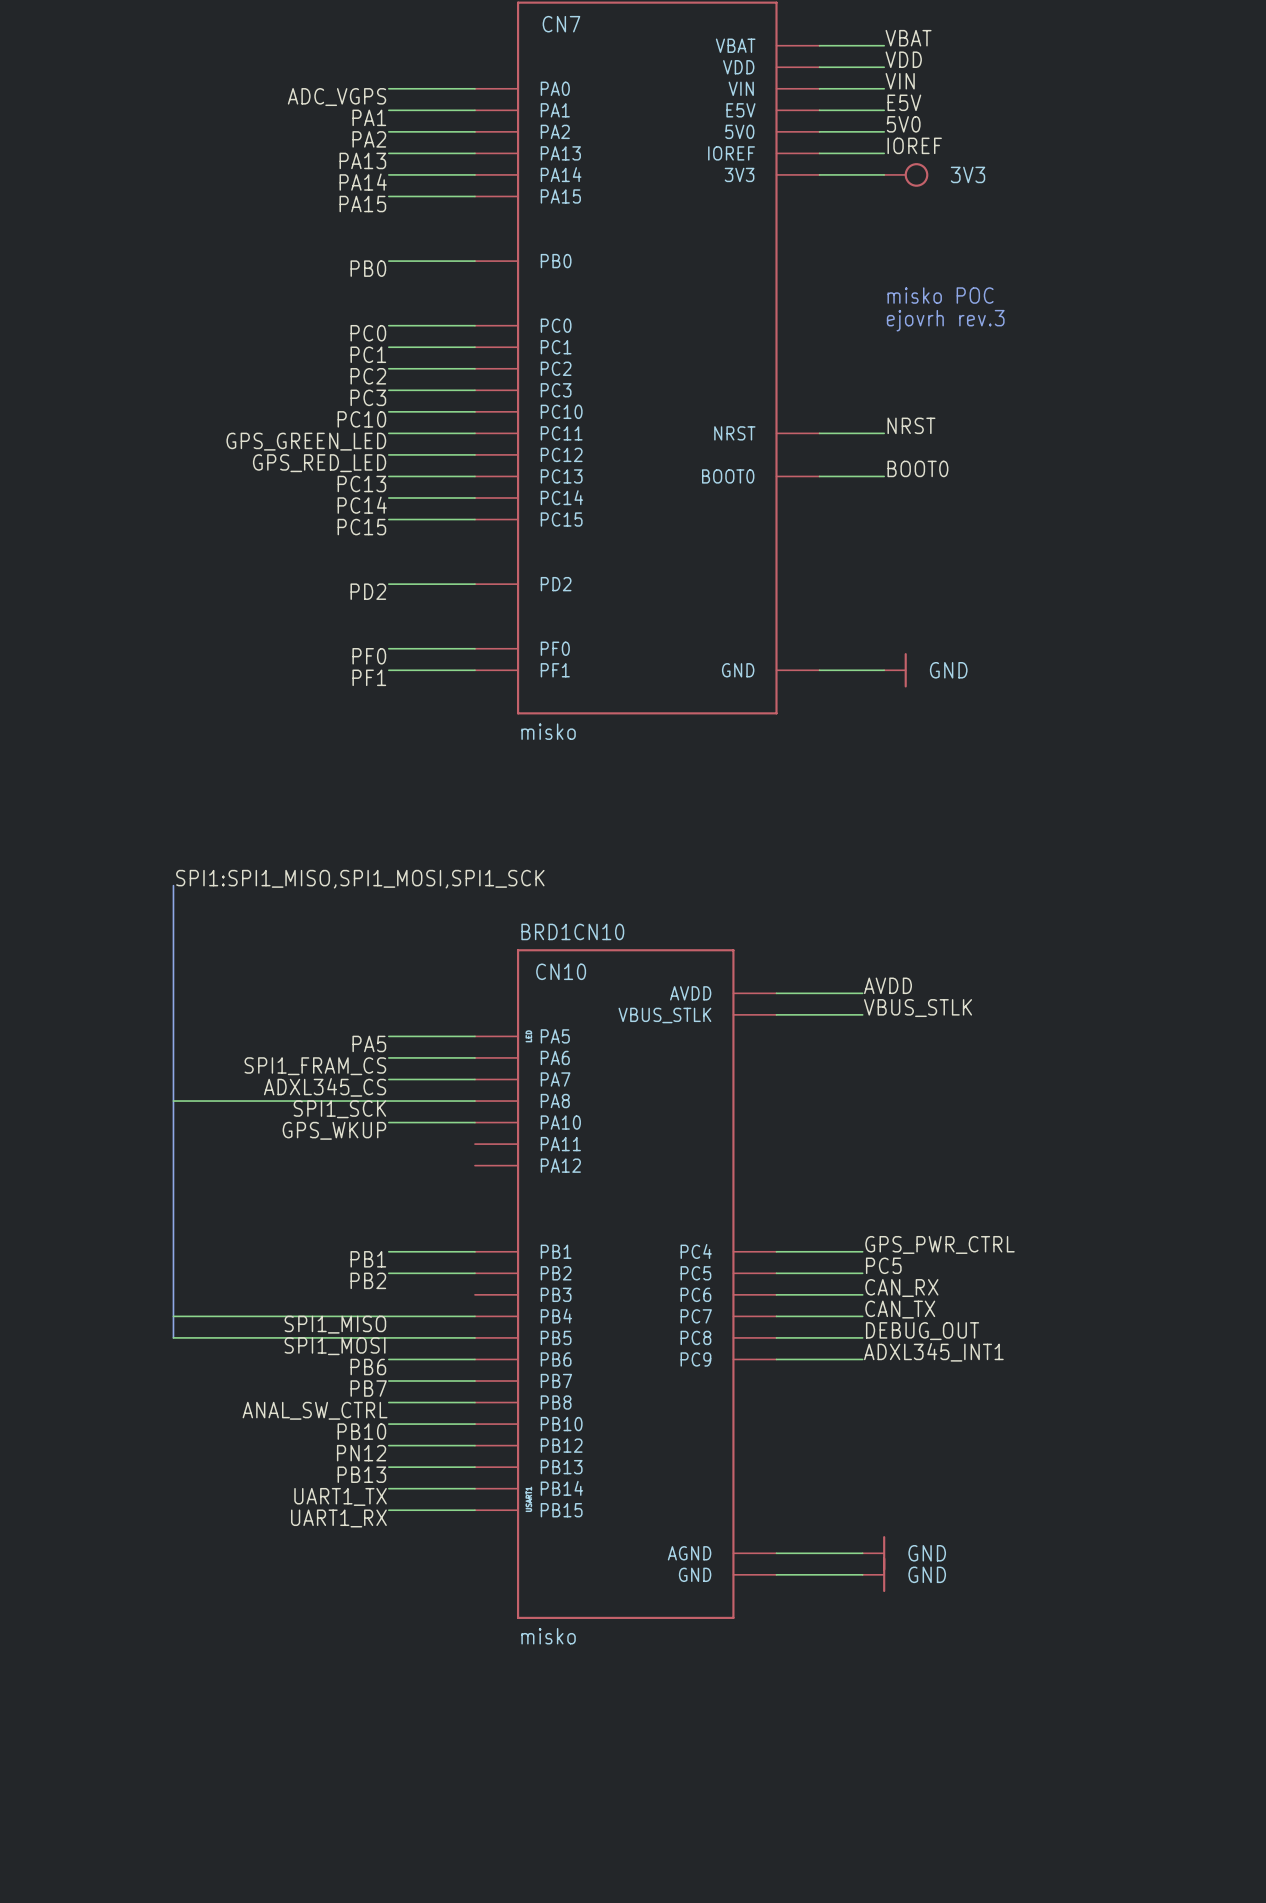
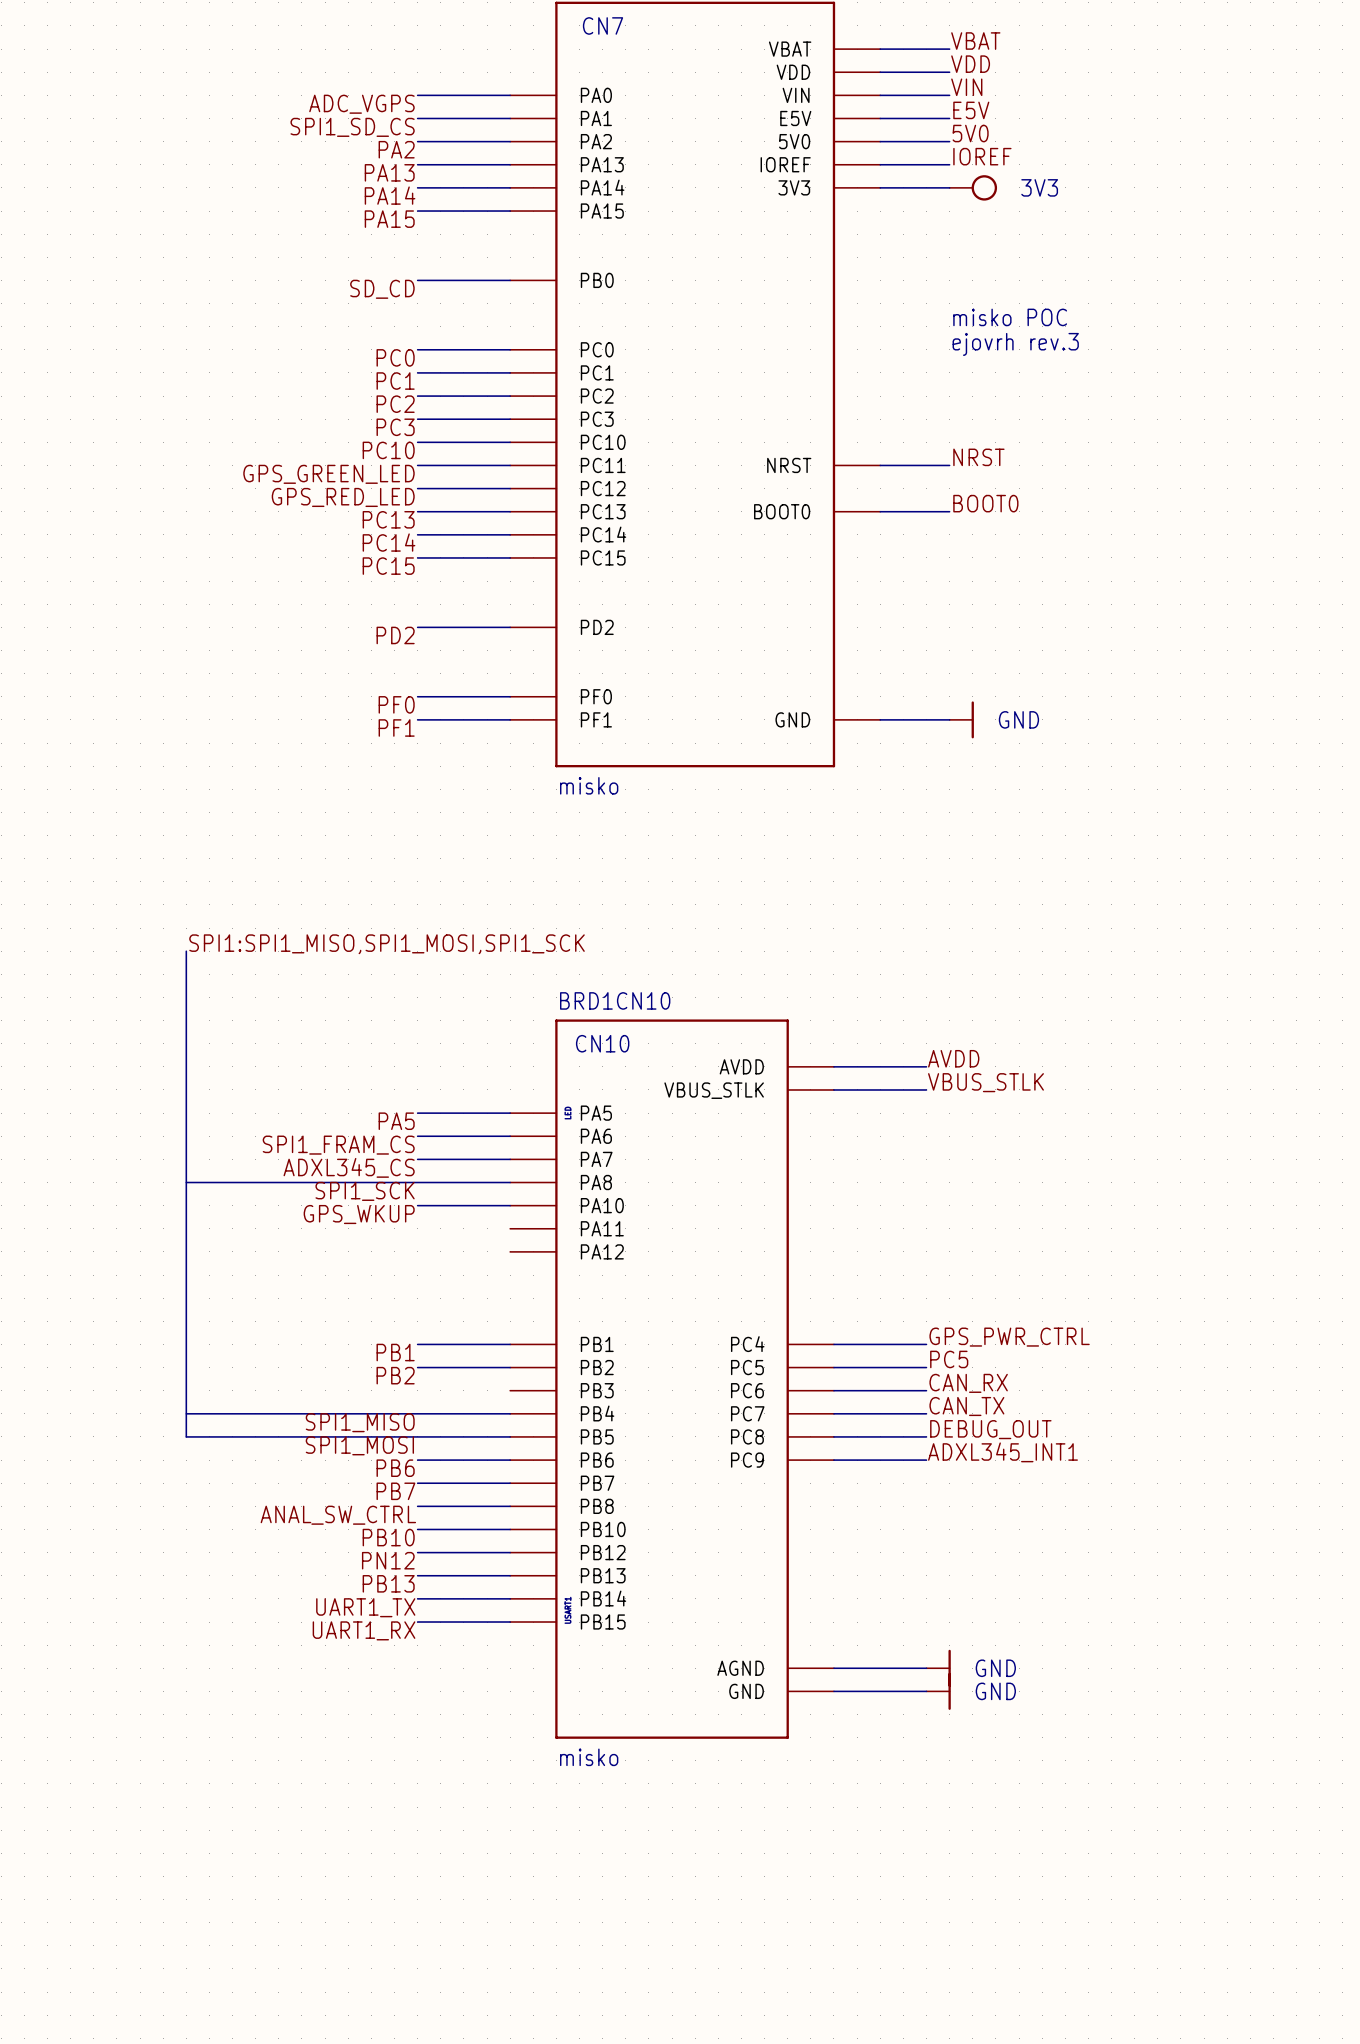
label: PA1 (369, 117) -> SPI1_SD_CS (352, 127)
label: PB0 (368, 268) -> SD_CD (382, 289)

